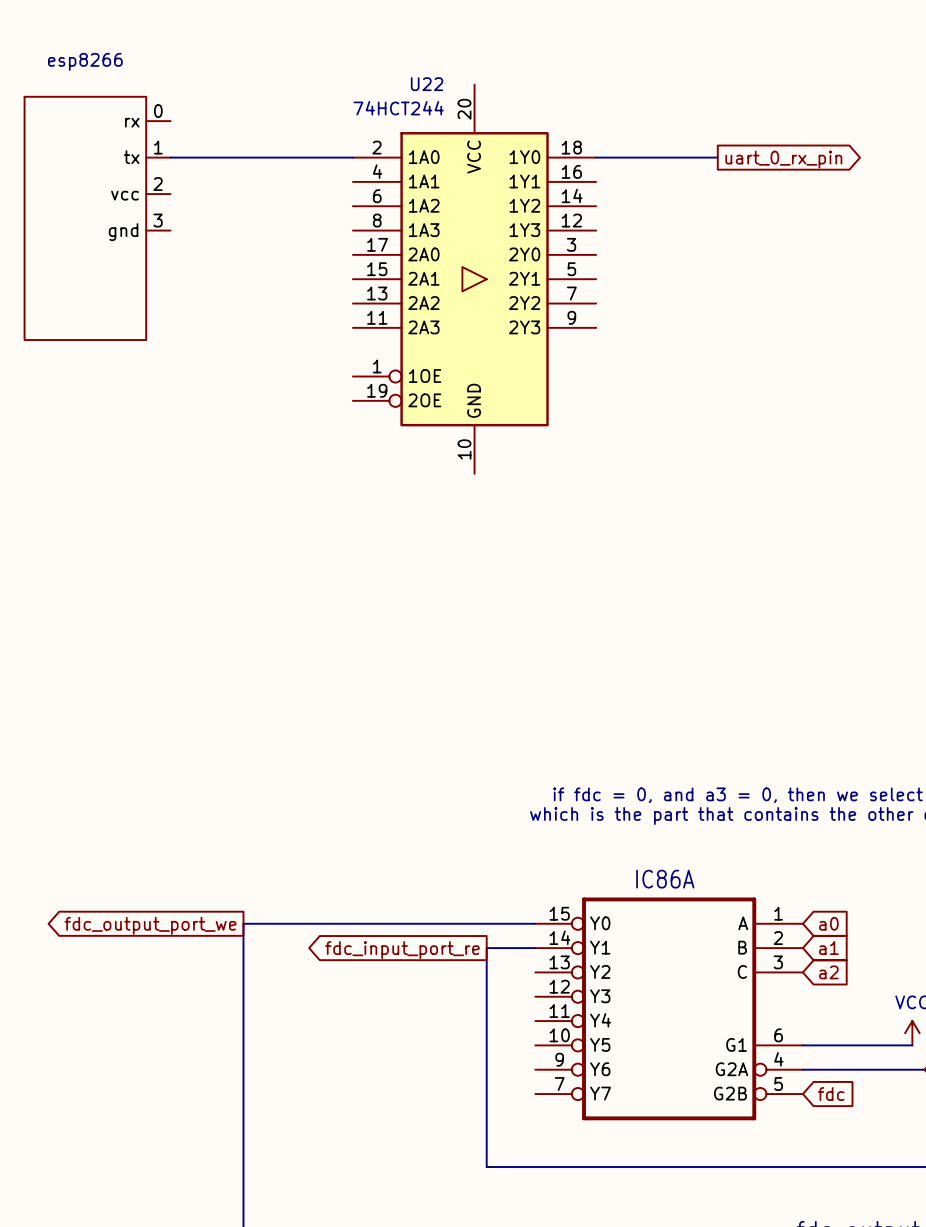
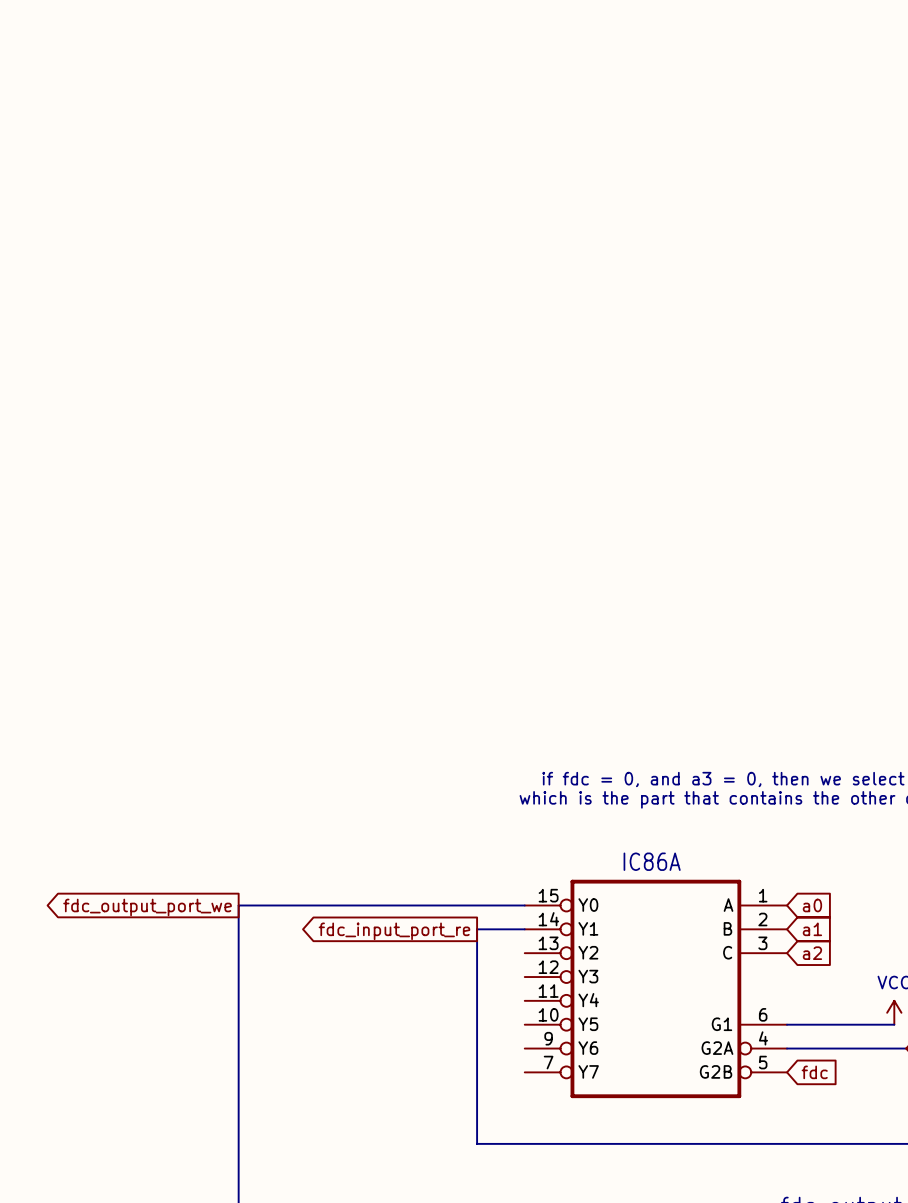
wire: (170, 157) (352, 157) -> none
wire: (596, 157) (717, 157) -> none
global label: uart_0_rx_pin (783, 159) -> none
esp8266: (97, 218) -> none
U22: 74HCT244 (474, 279) -> none

